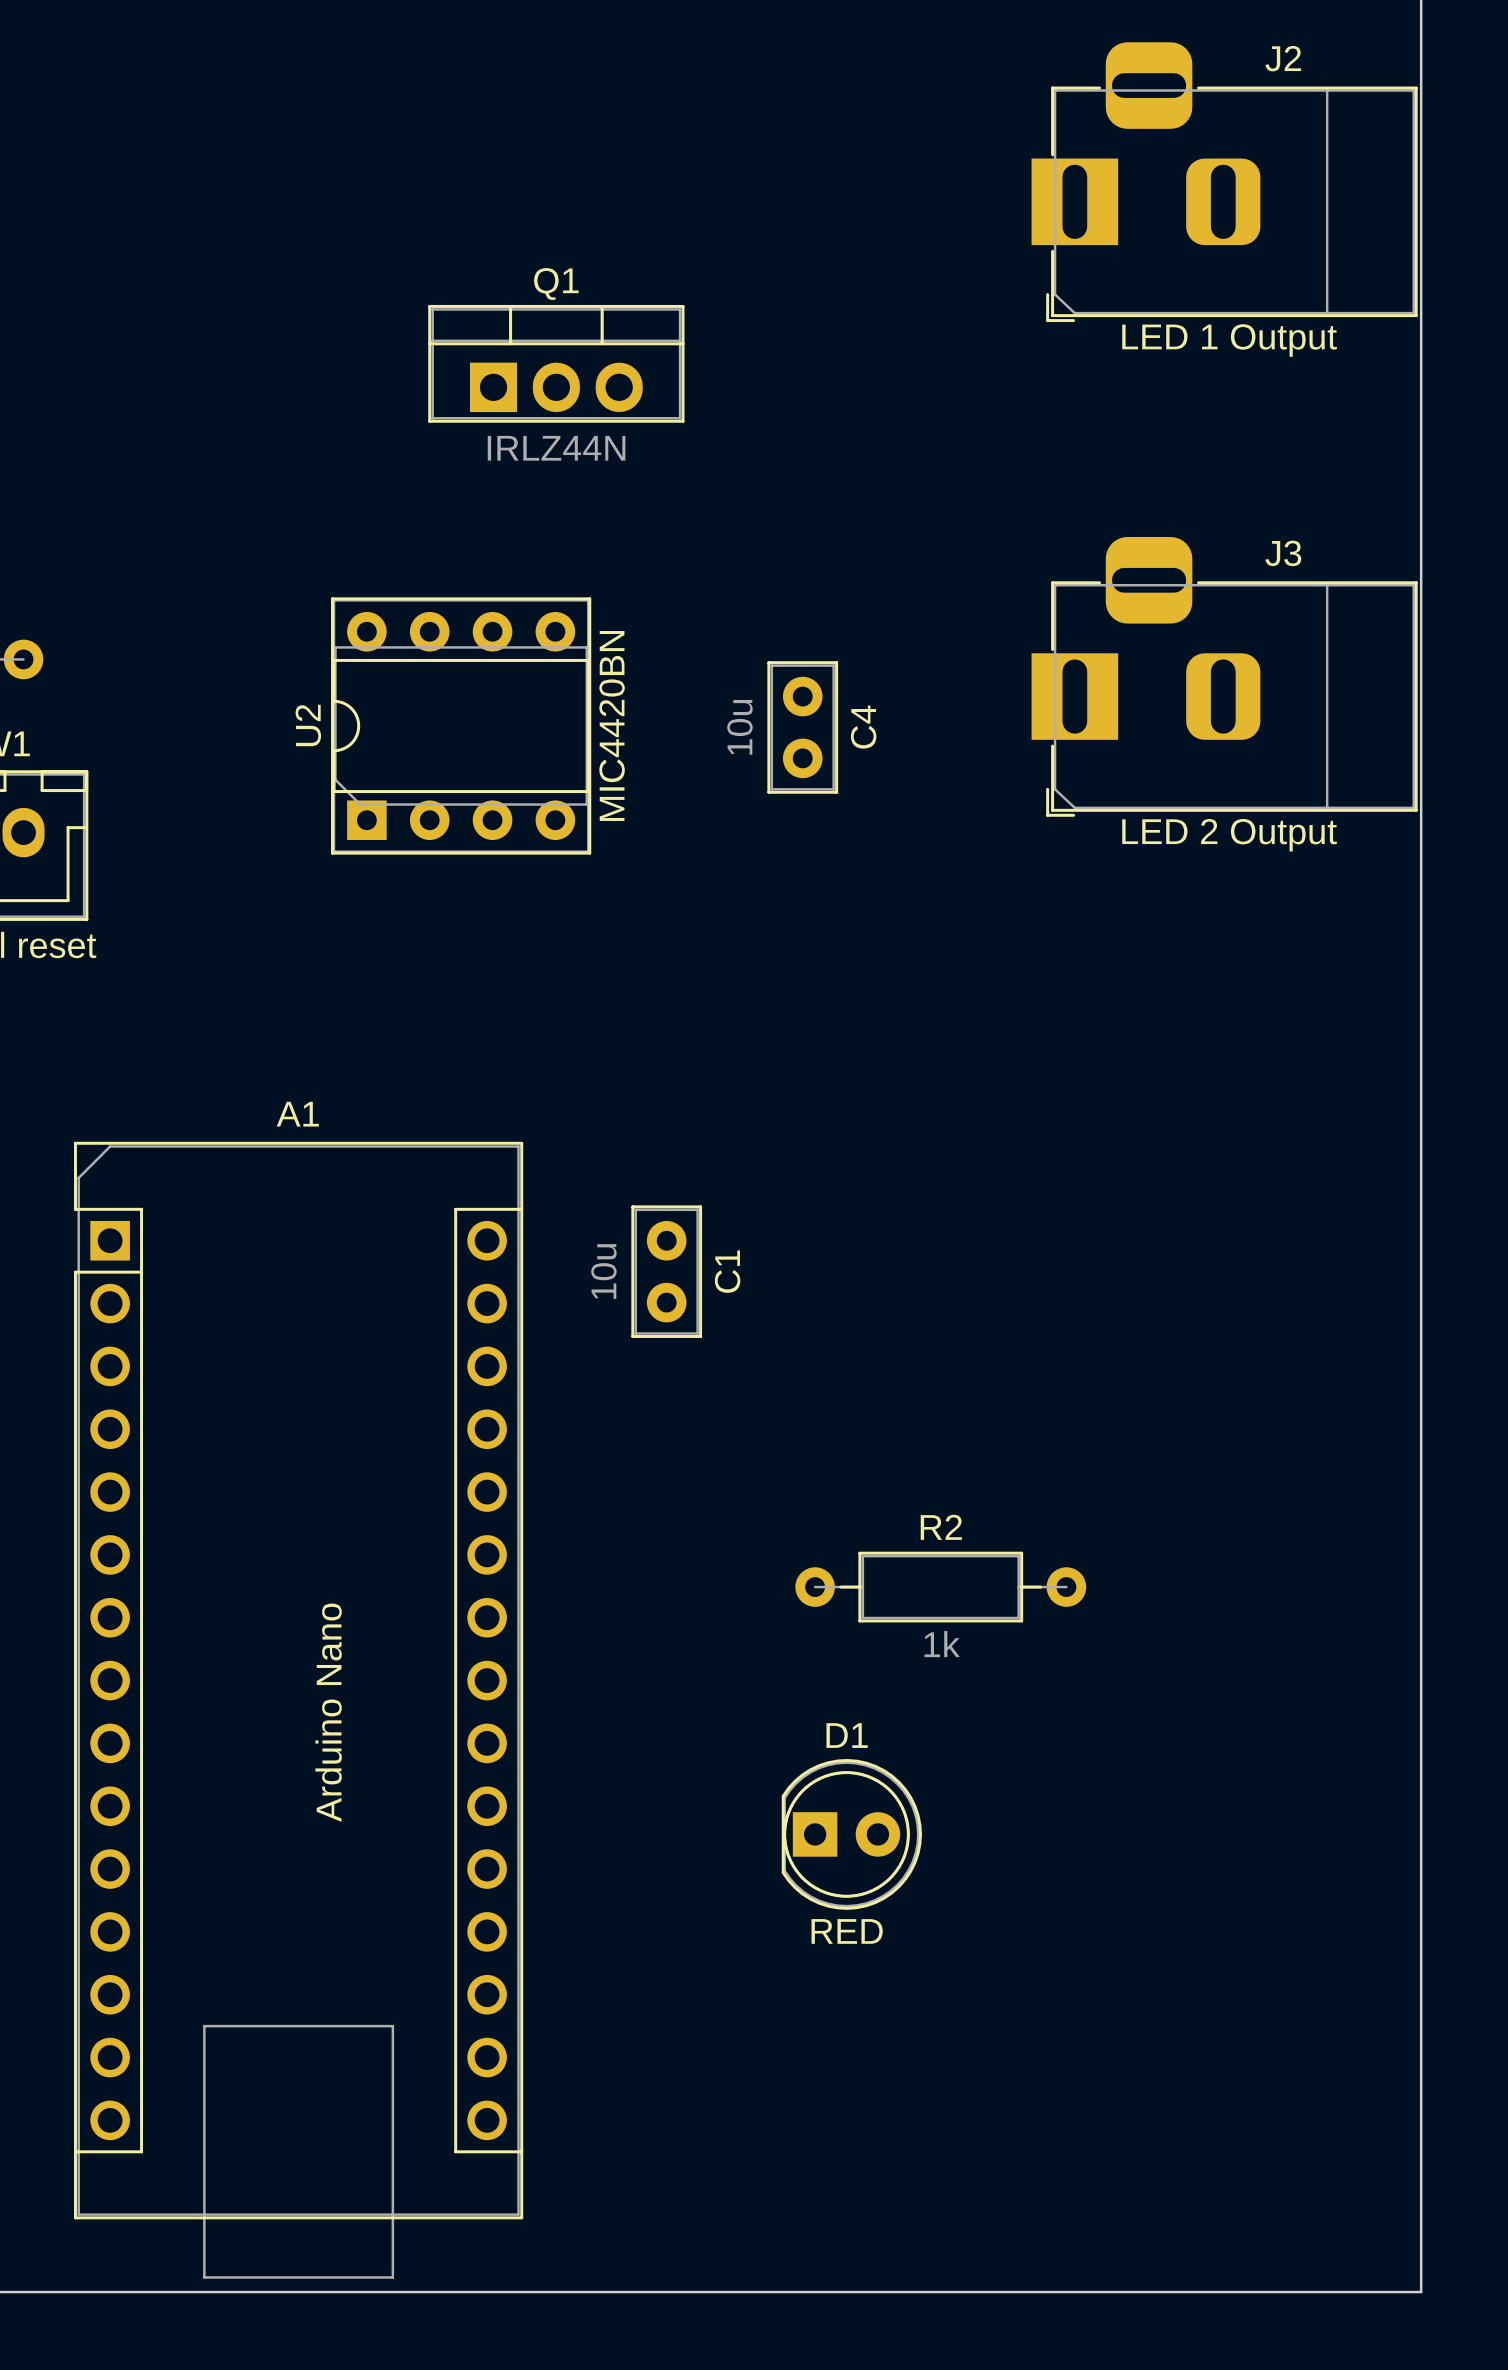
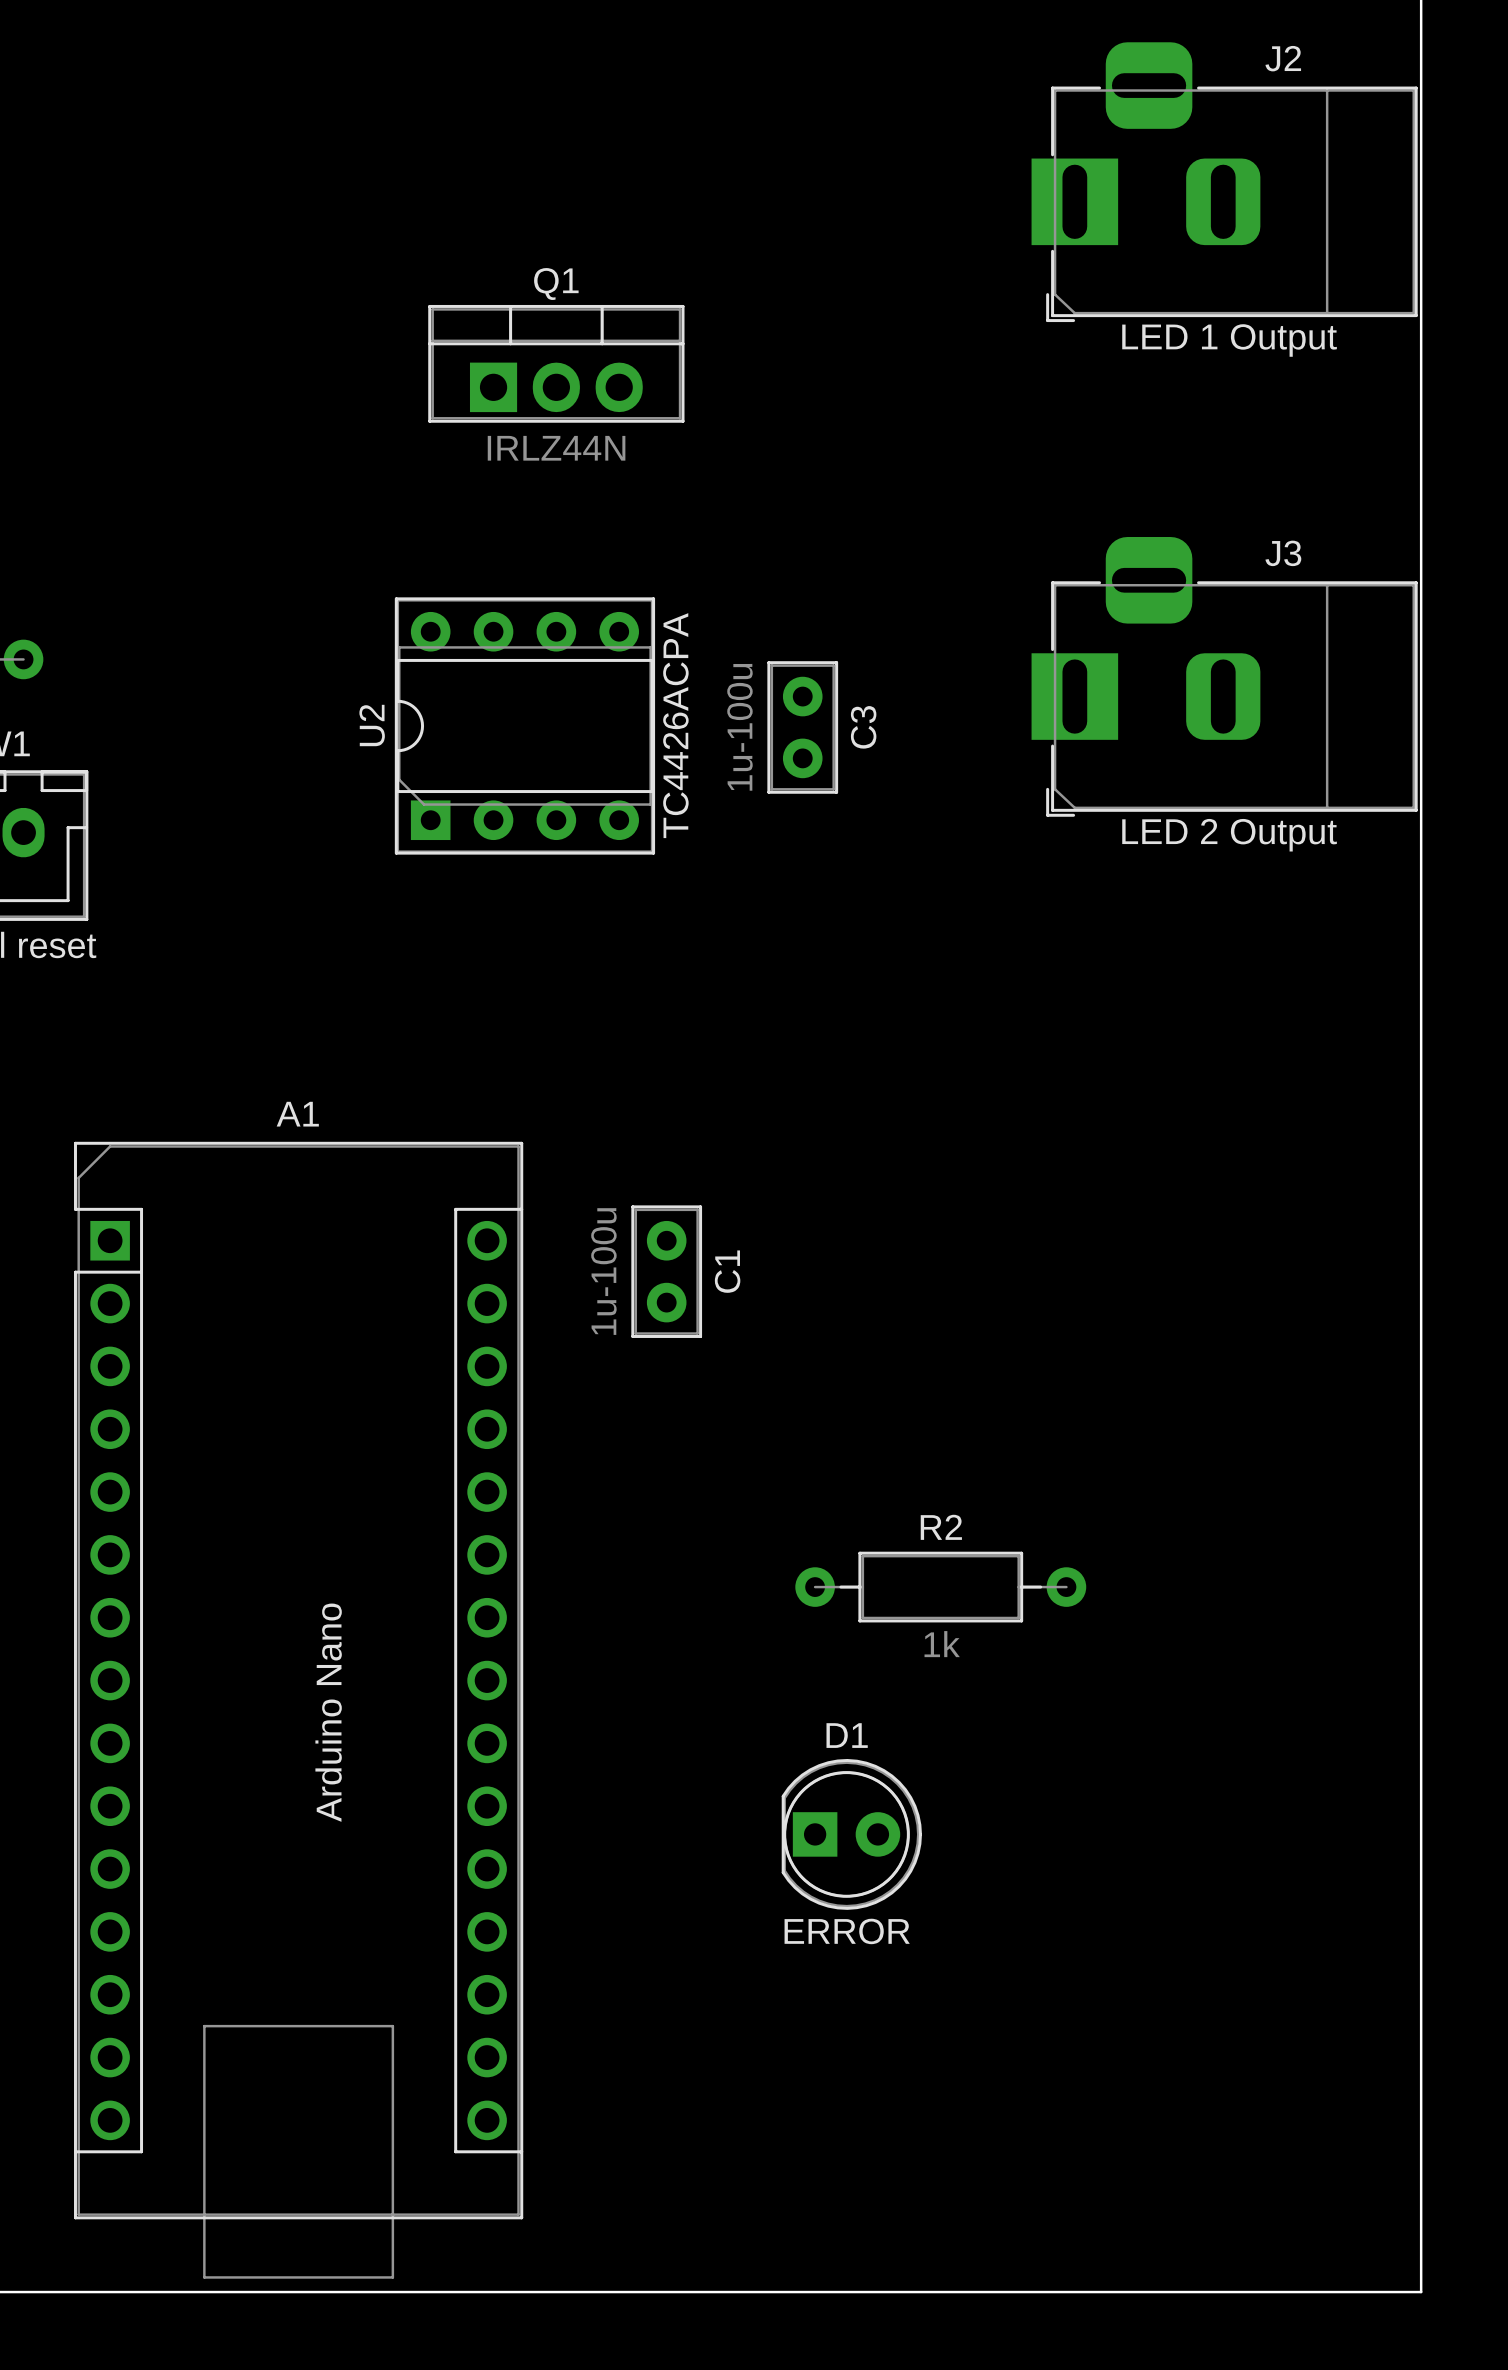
U2 position: (461, 725) -> (524, 725)
U2 value: MIC4420BN (612, 725) -> TC4426ACPA (675, 725)
C4 value: 10u (739, 727) -> 1u-100u (739, 727)
C4 name: C4 (863, 727) -> C3 (863, 727)
C1 value: 10u (603, 1271) -> 1u-100u (603, 1271)
D1 value: RED (847, 1931) -> ERROR (847, 1931)

